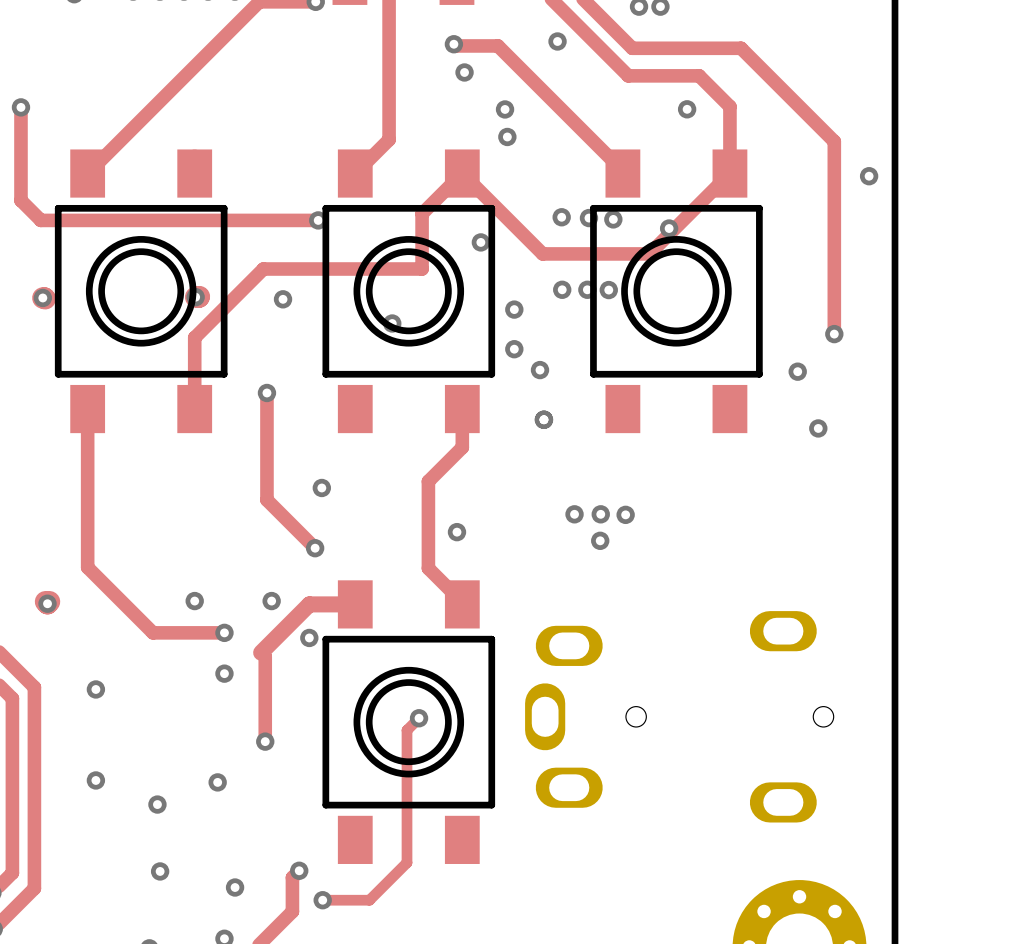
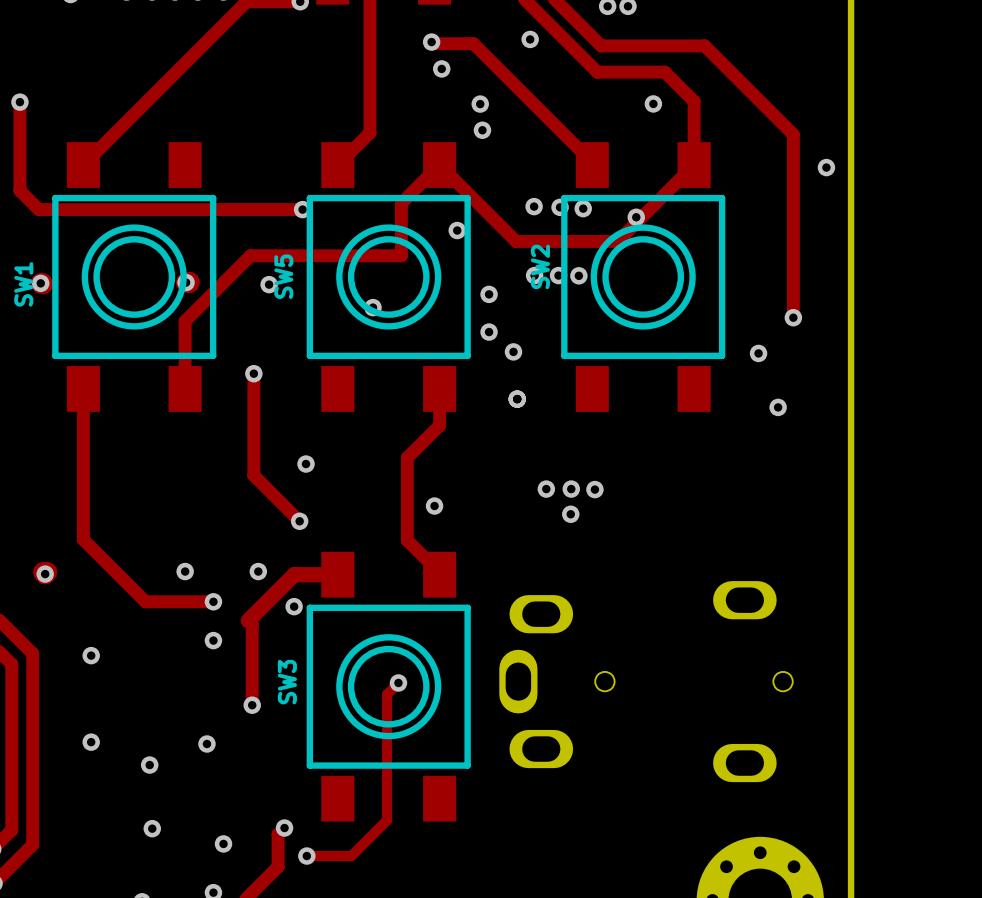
SW2 name: none -> SW2 (540, 266)
SW5 name: none -> SW5 (283, 276)
SW1 name: none -> SW1 (23, 284)
SW3 name: none -> SW3 (287, 682)

